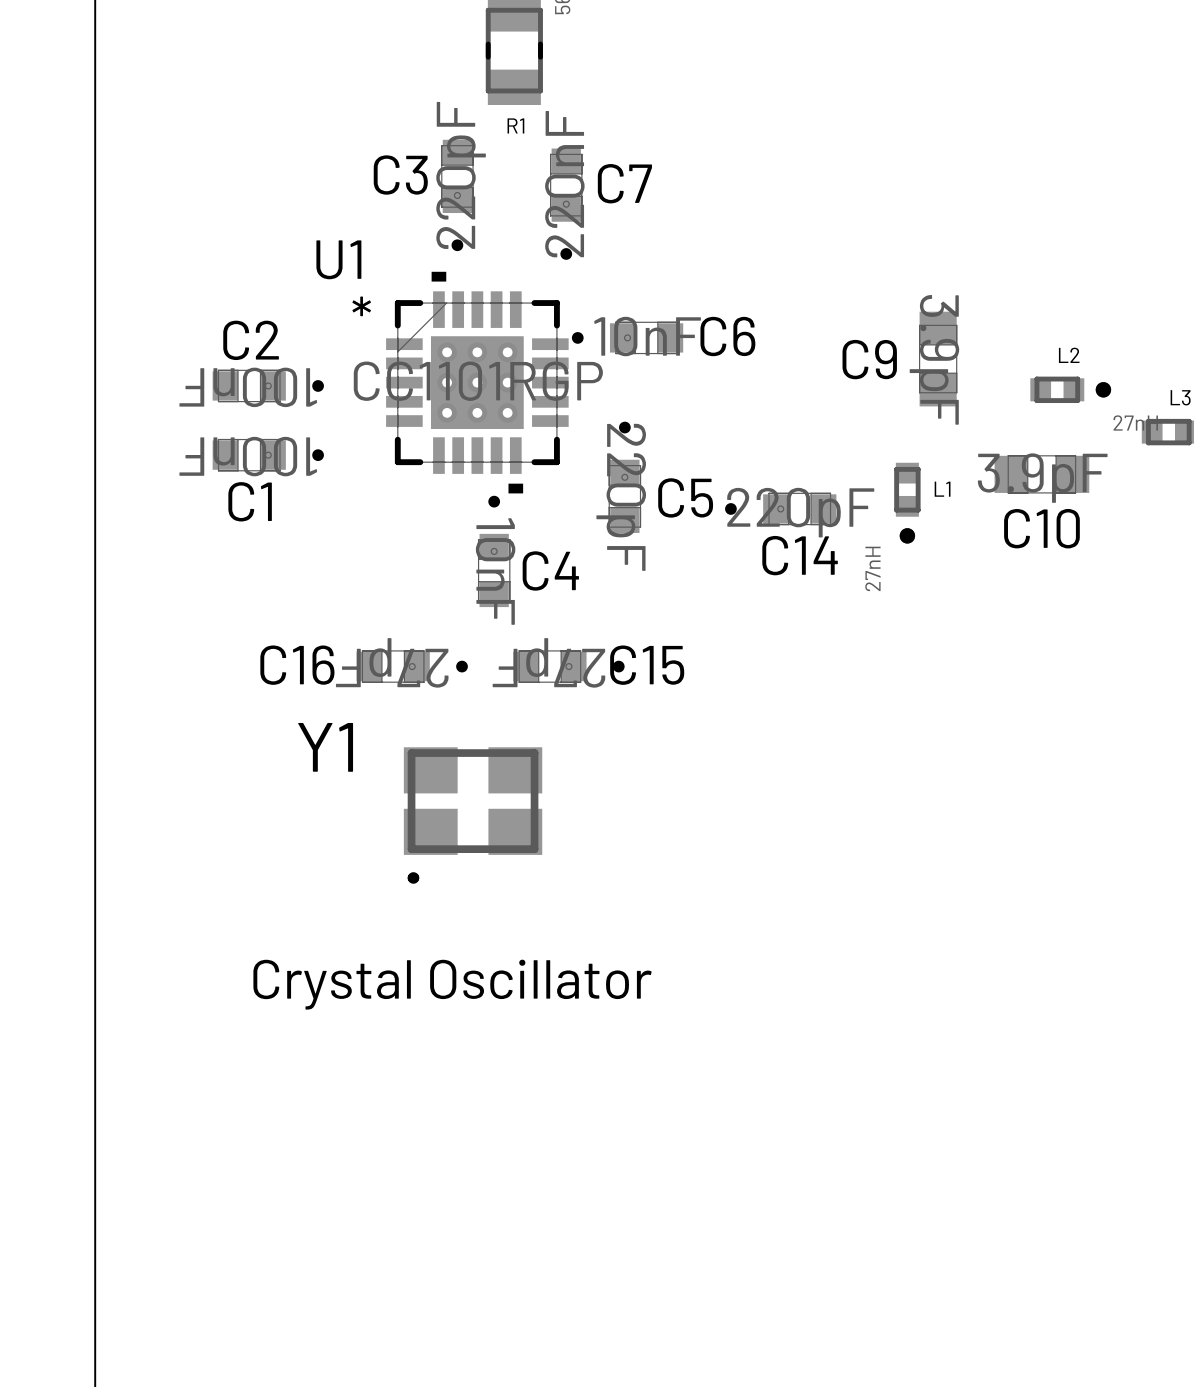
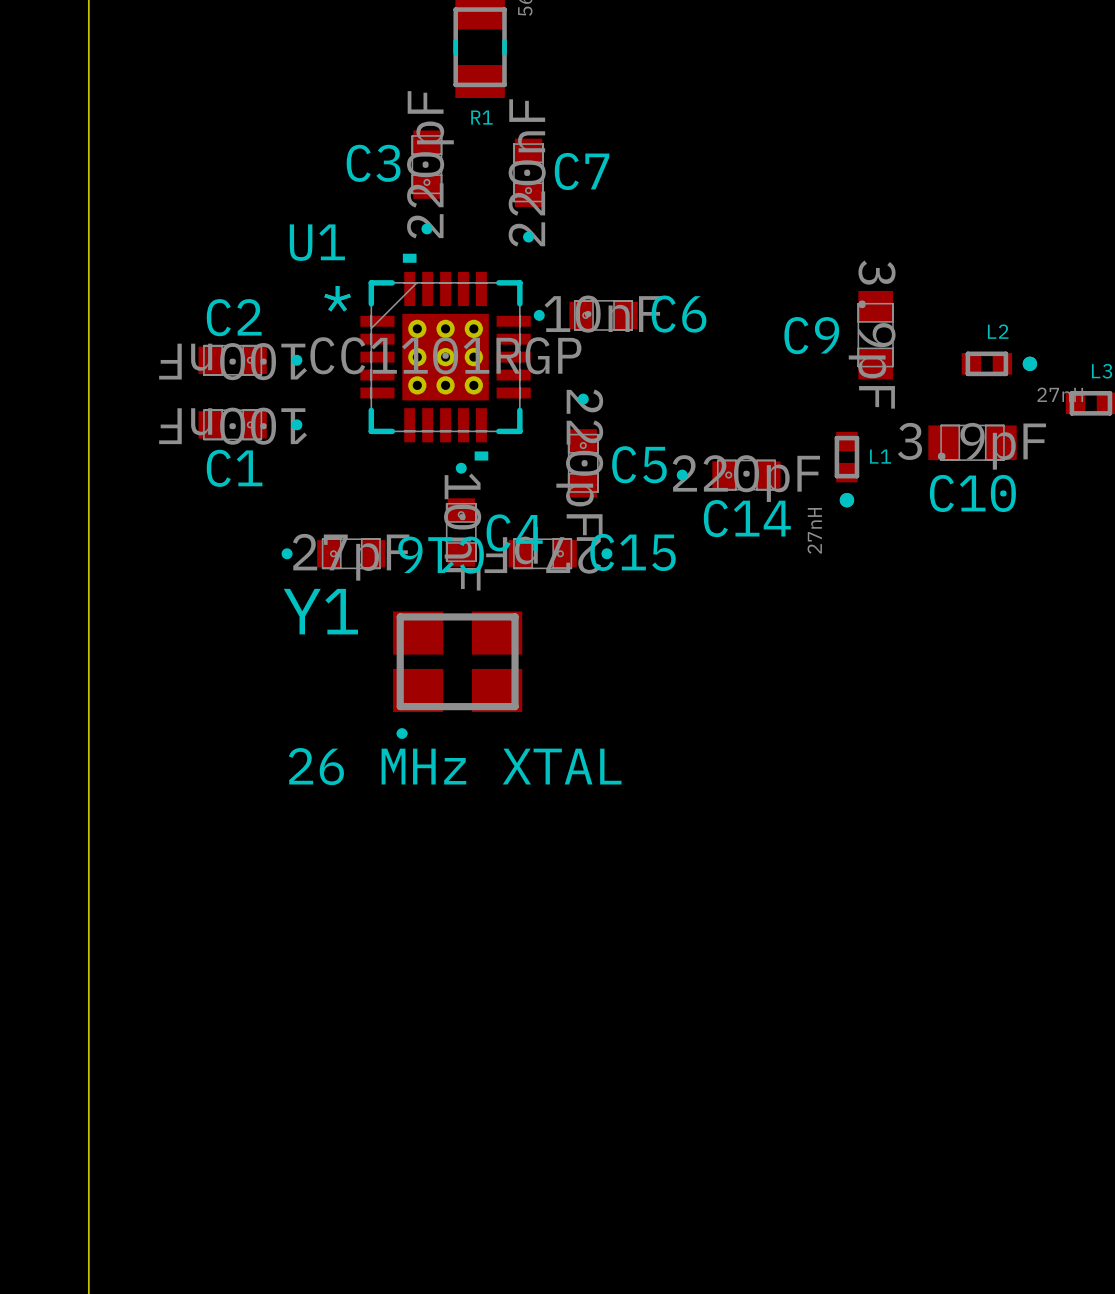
C16 rotation: 0° (412, 666) -> 180° (333, 553)
C16 position: (412, 666) -> (333, 553)
C15 position: (568, 666) -> (560, 553)
Y1 position: (473, 815) -> (457, 675)
text: none -> 26 MHz XTAL (455, 766)
text: Crystal Oscillator (452, 984) -> none

